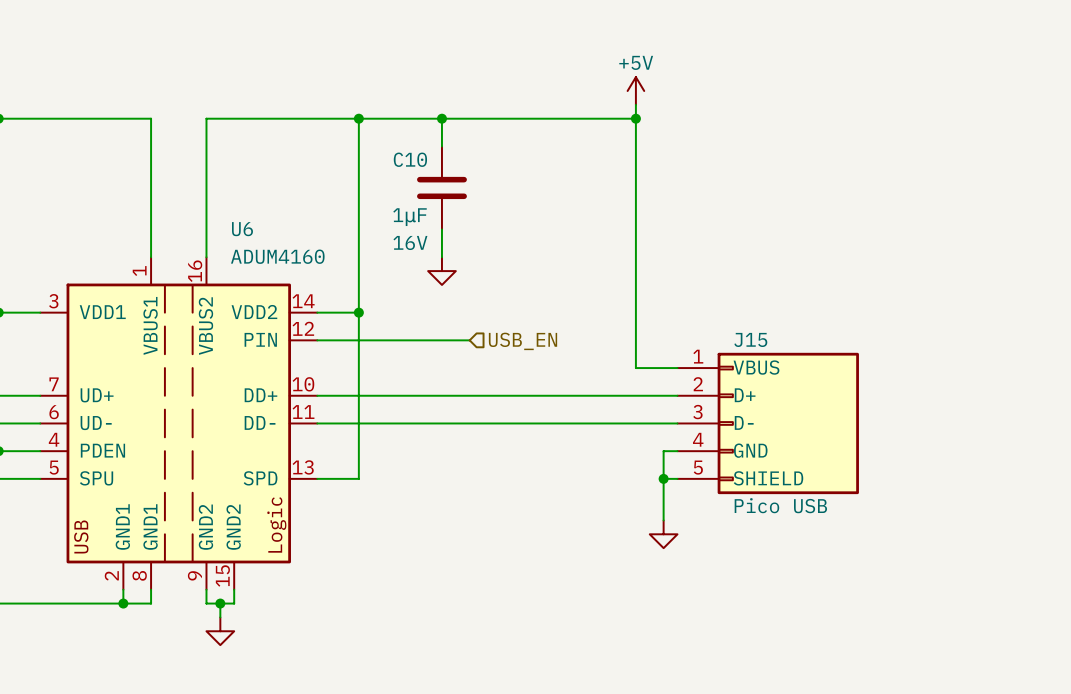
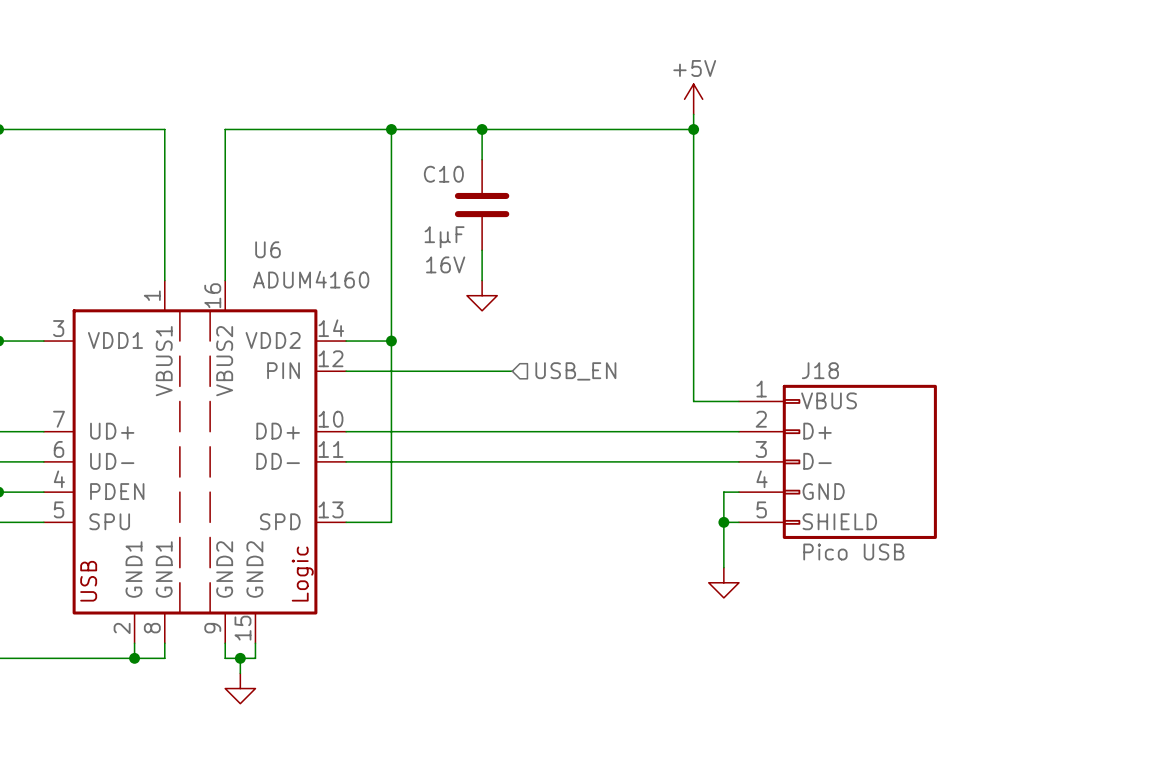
J15 name: J15 (750, 339) -> J18 (820, 370)

